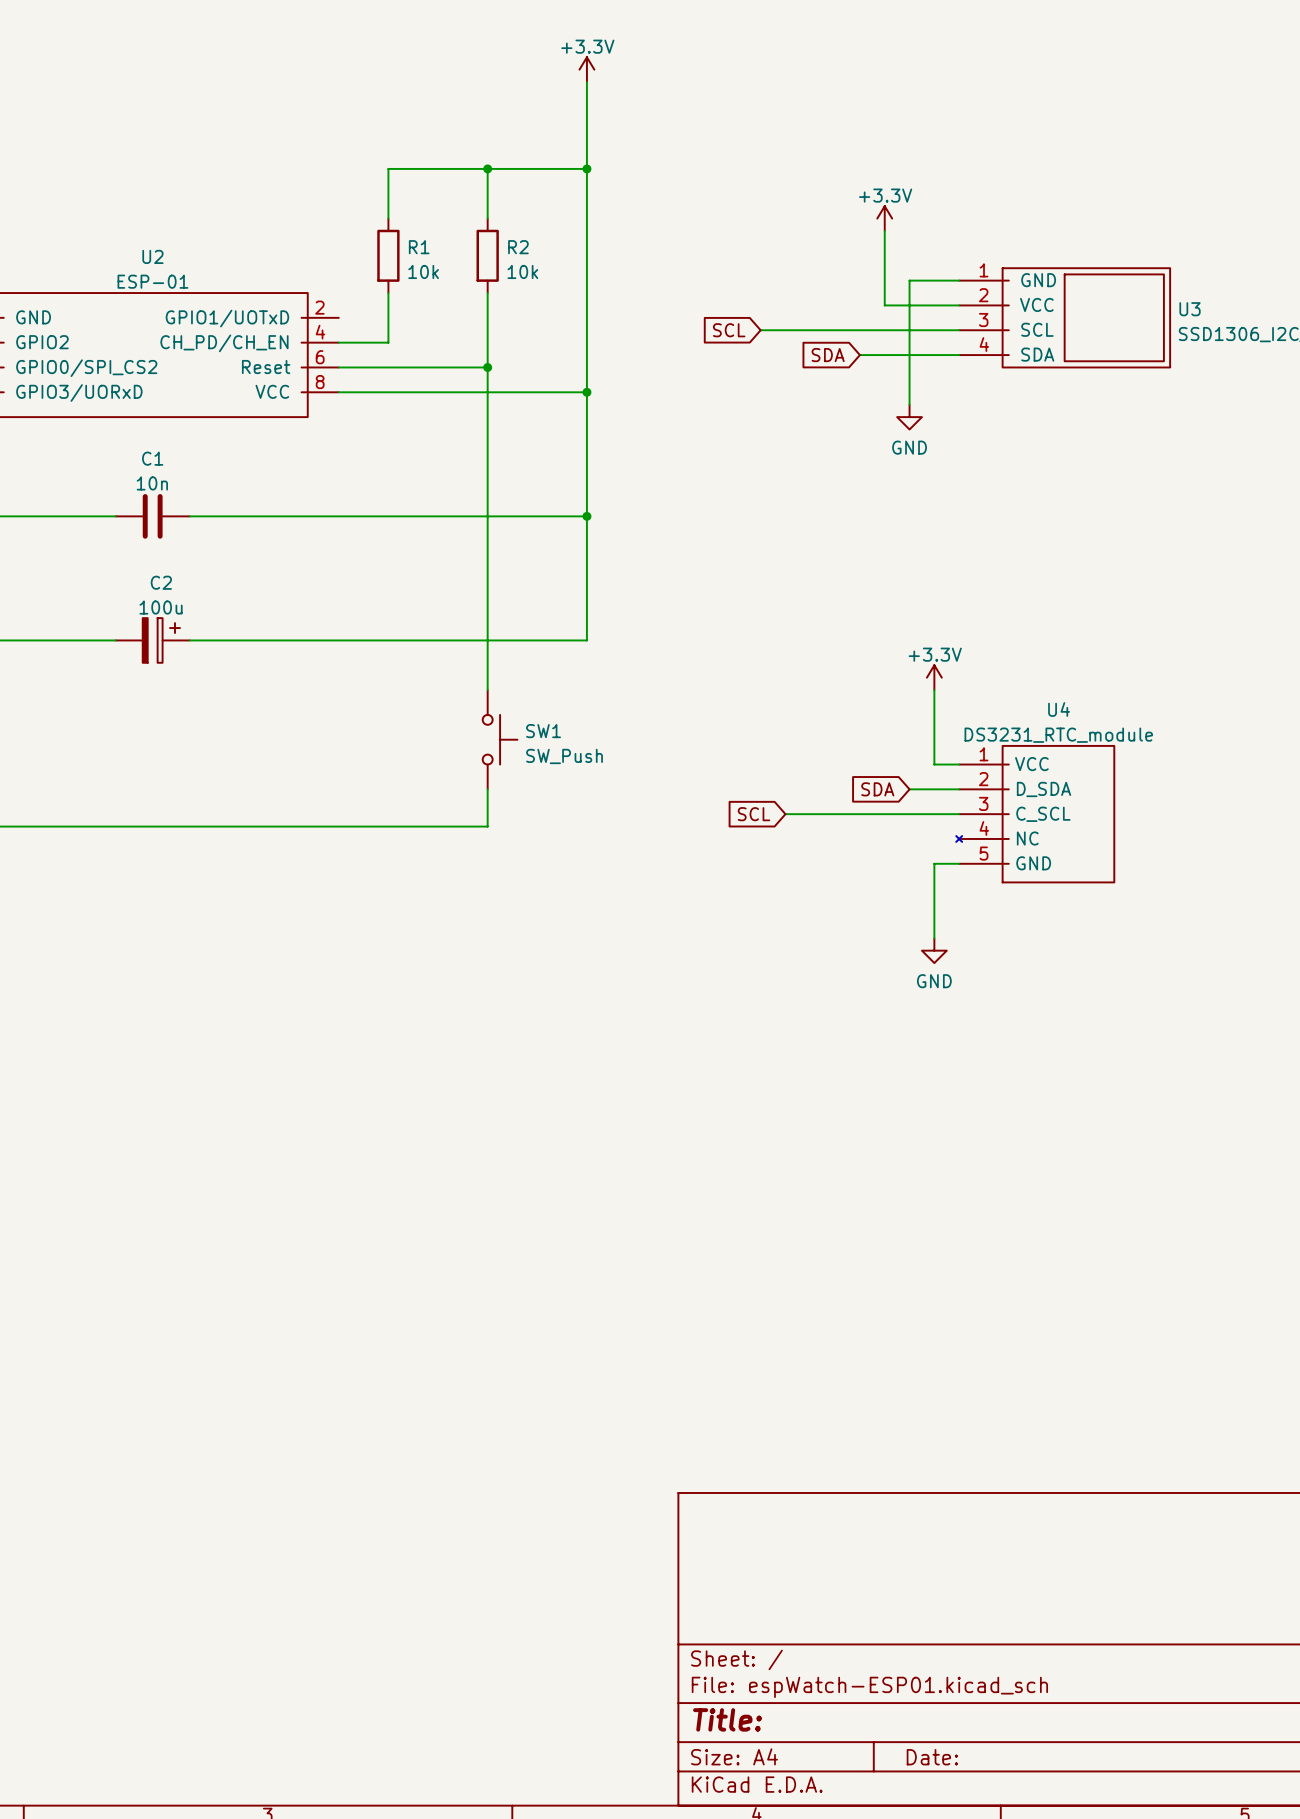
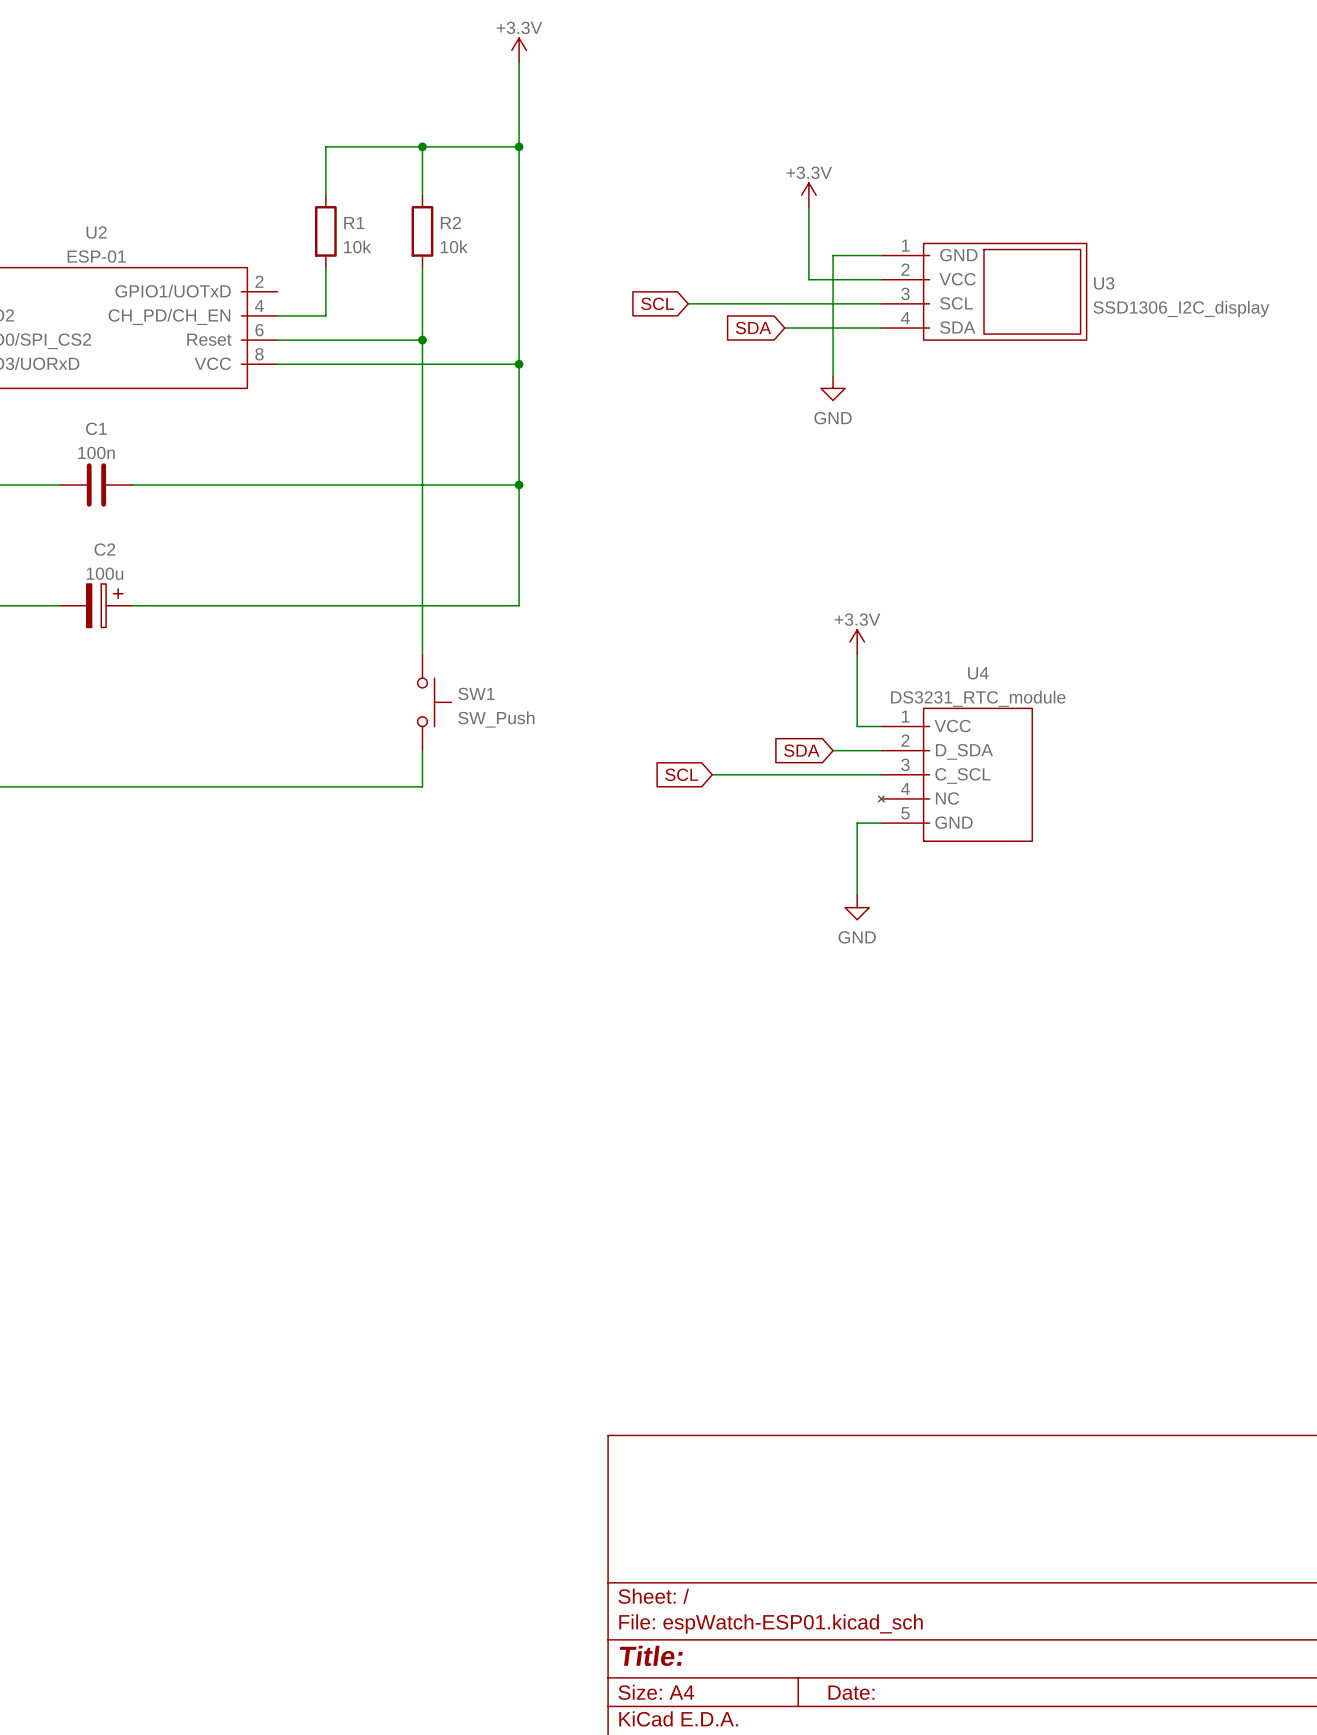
C1 value: 10n (152, 483) -> 100n (96, 452)

